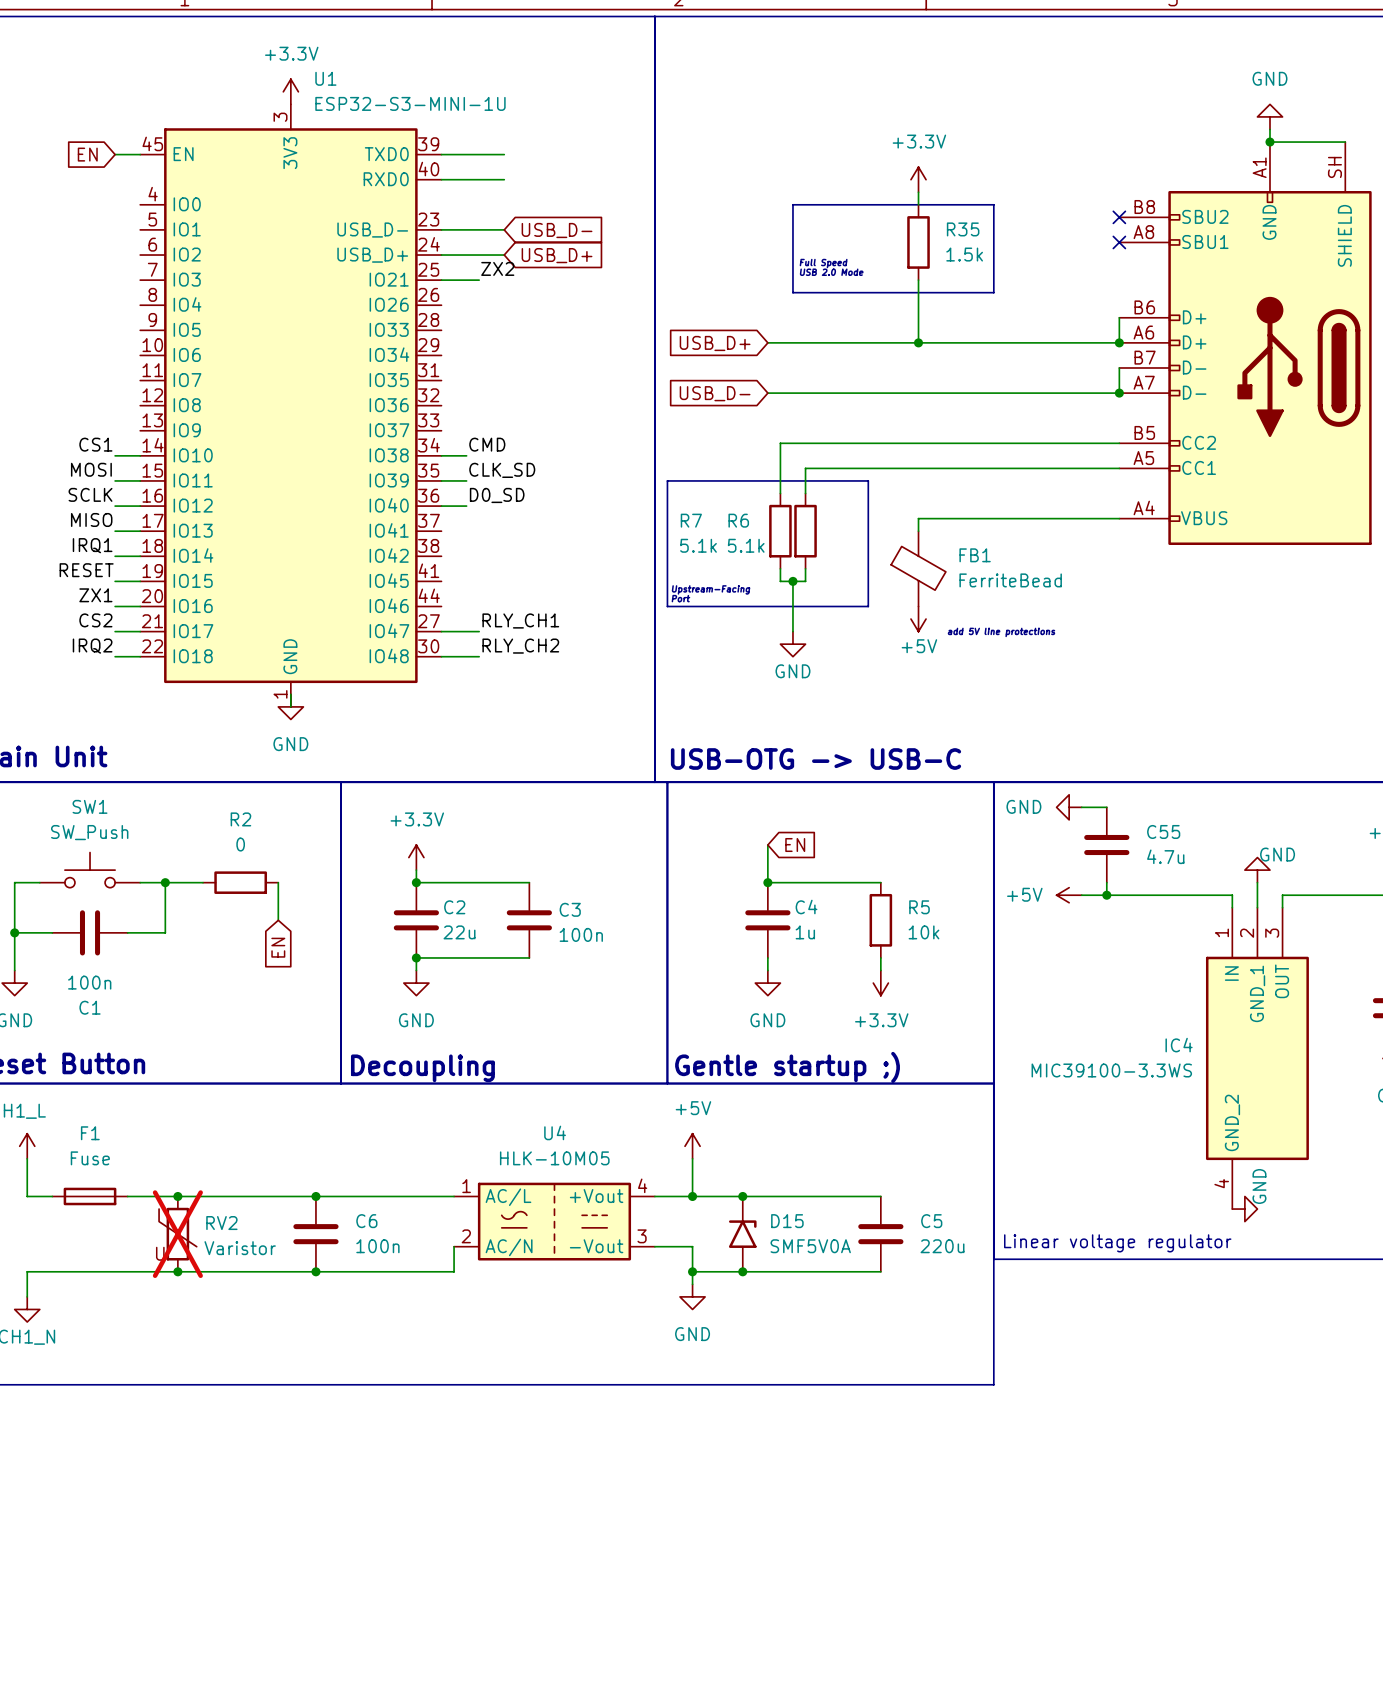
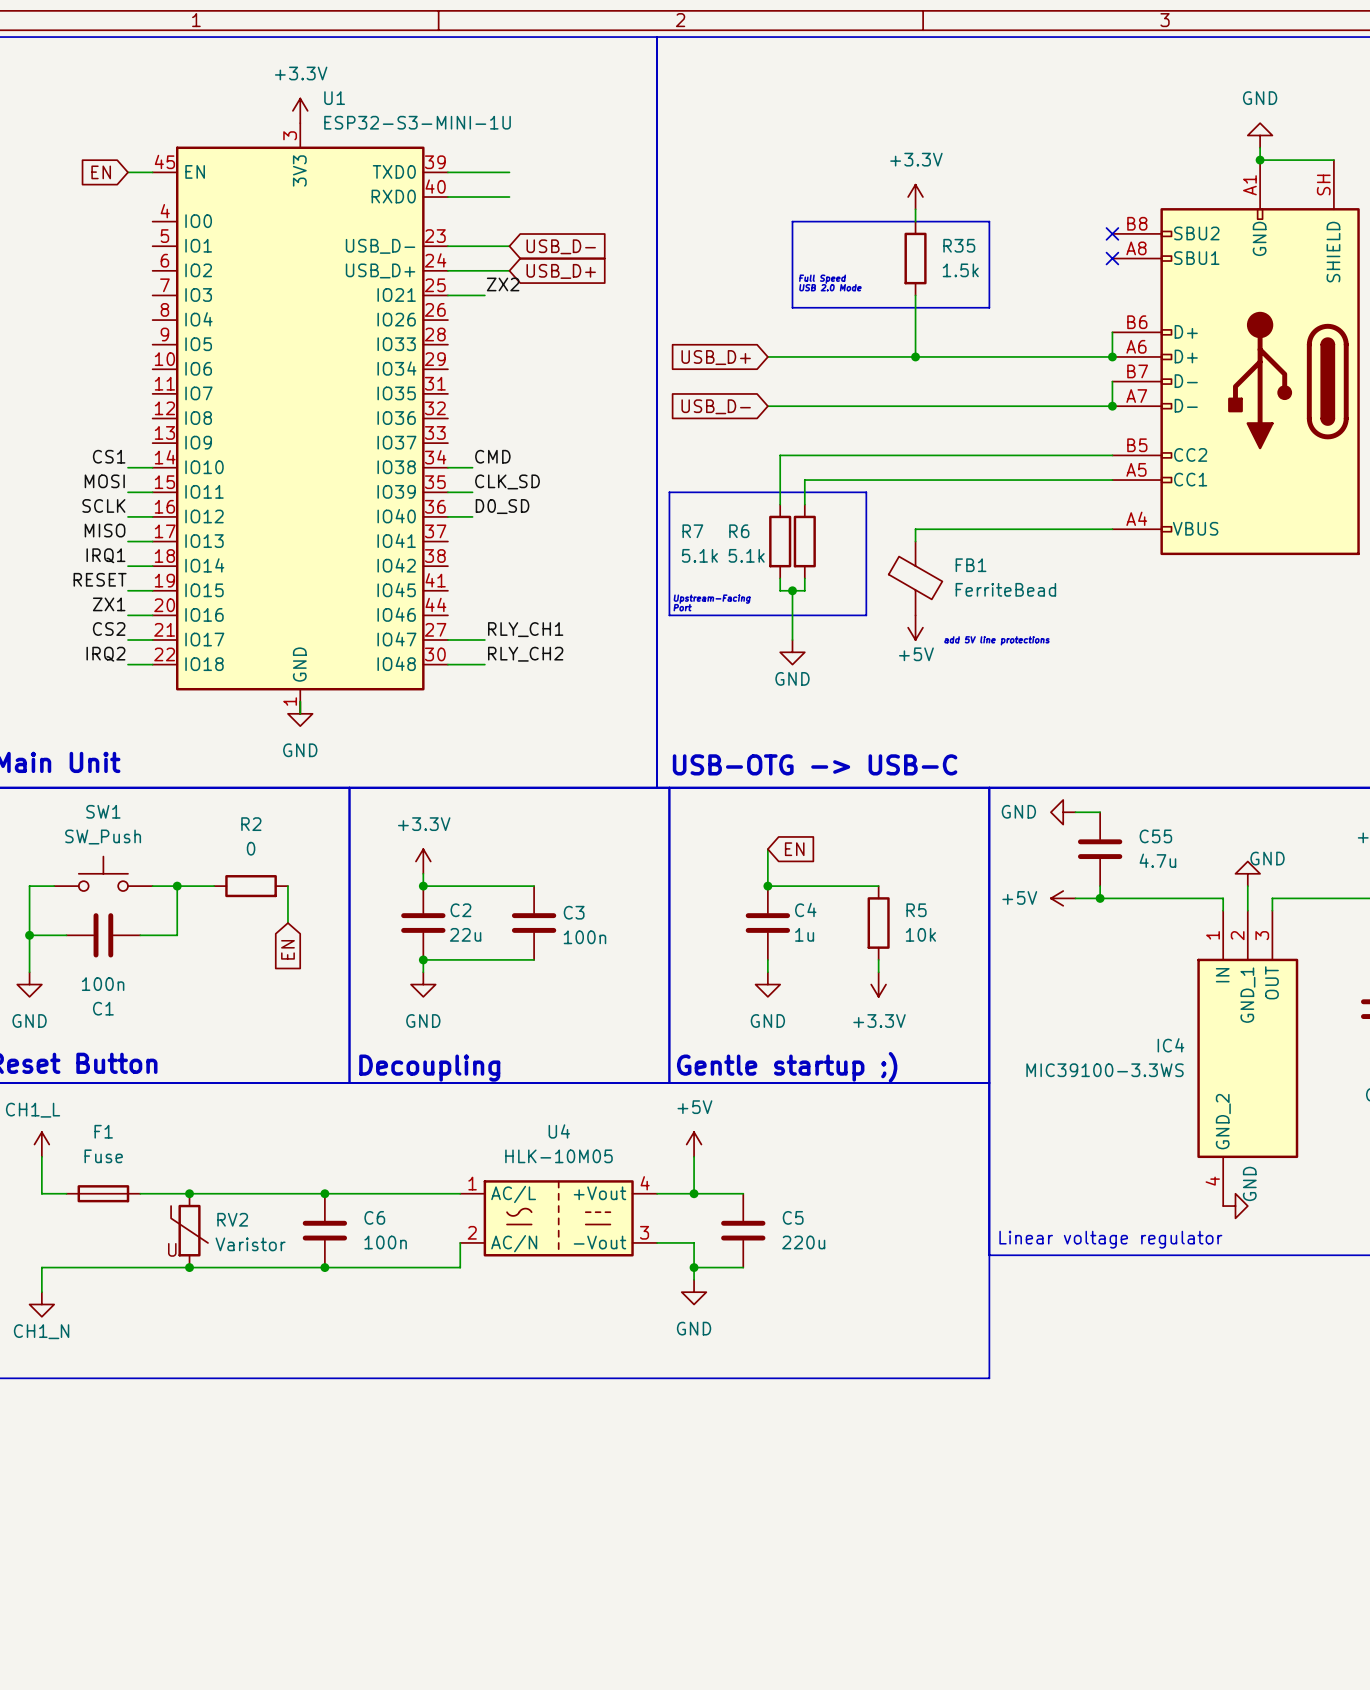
wire: (742, 1196) (880, 1196) -> none
junction: (742, 1196) -> none
RV2 do-not-place cross: (177, 1234) -> none
D15: SMF5V0A (742, 1234) -> none
C5 position: (880, 1234) -> (743, 1230)
wire: (742, 1271) (880, 1271) -> none
junction: (742, 1271) -> none

